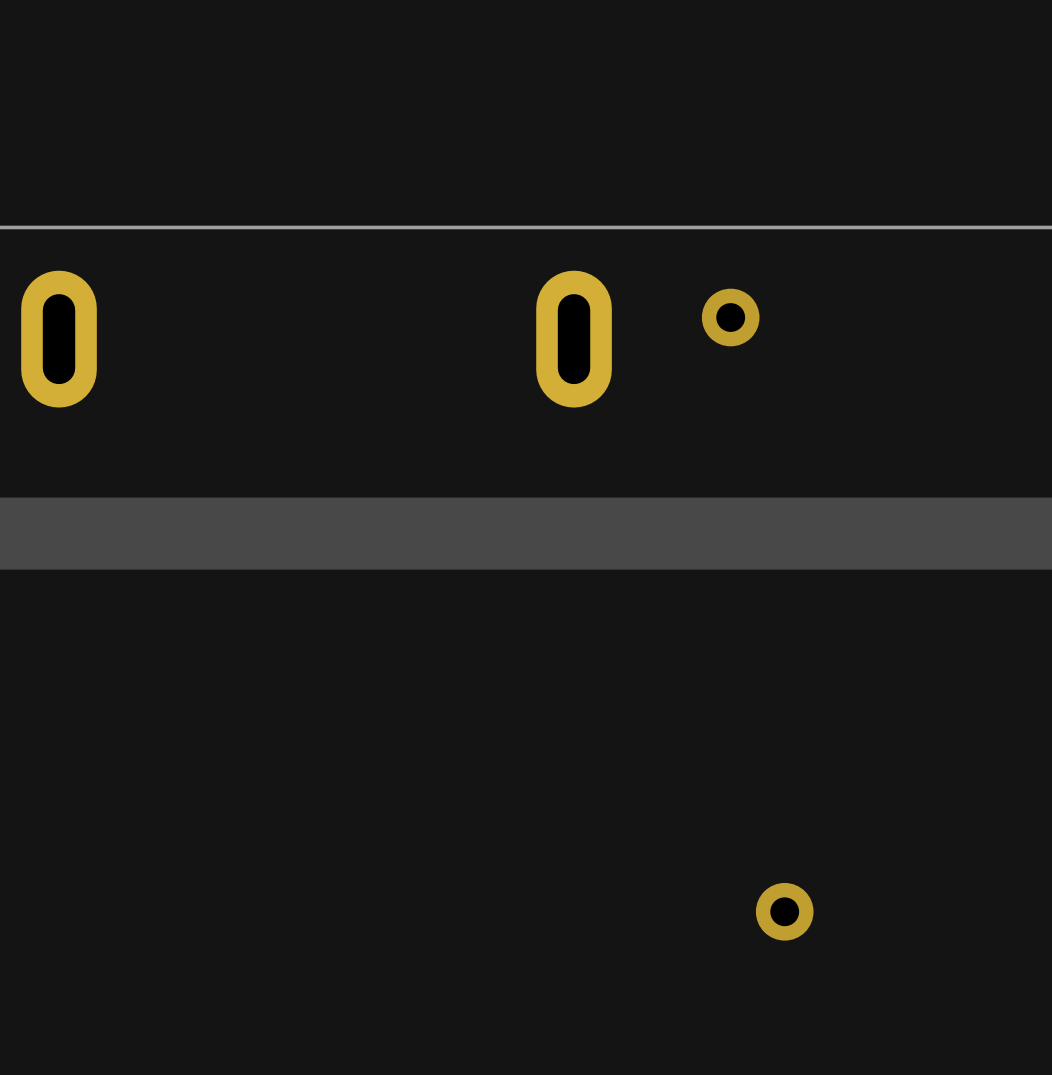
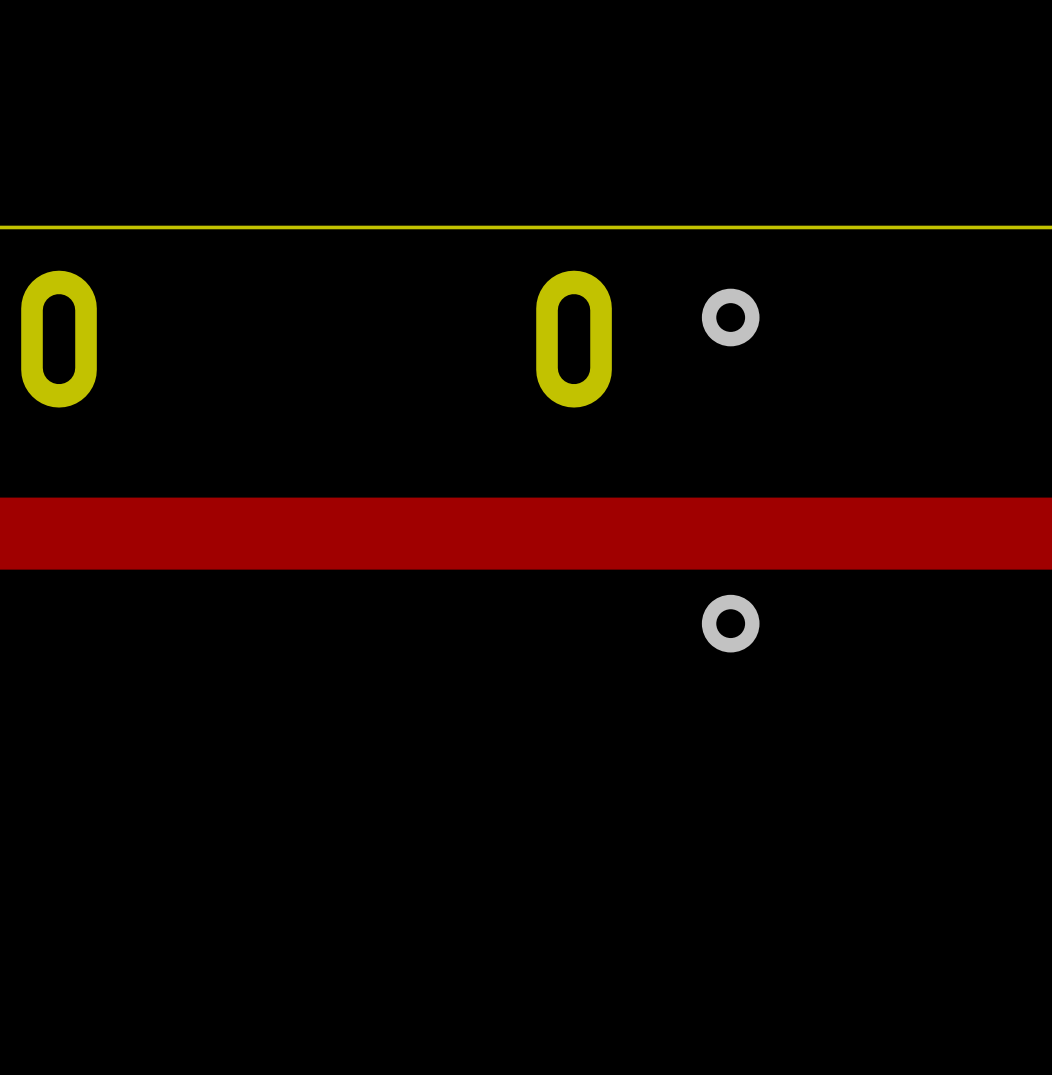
via: none -> (730, 623)
via: (784, 911) -> none

